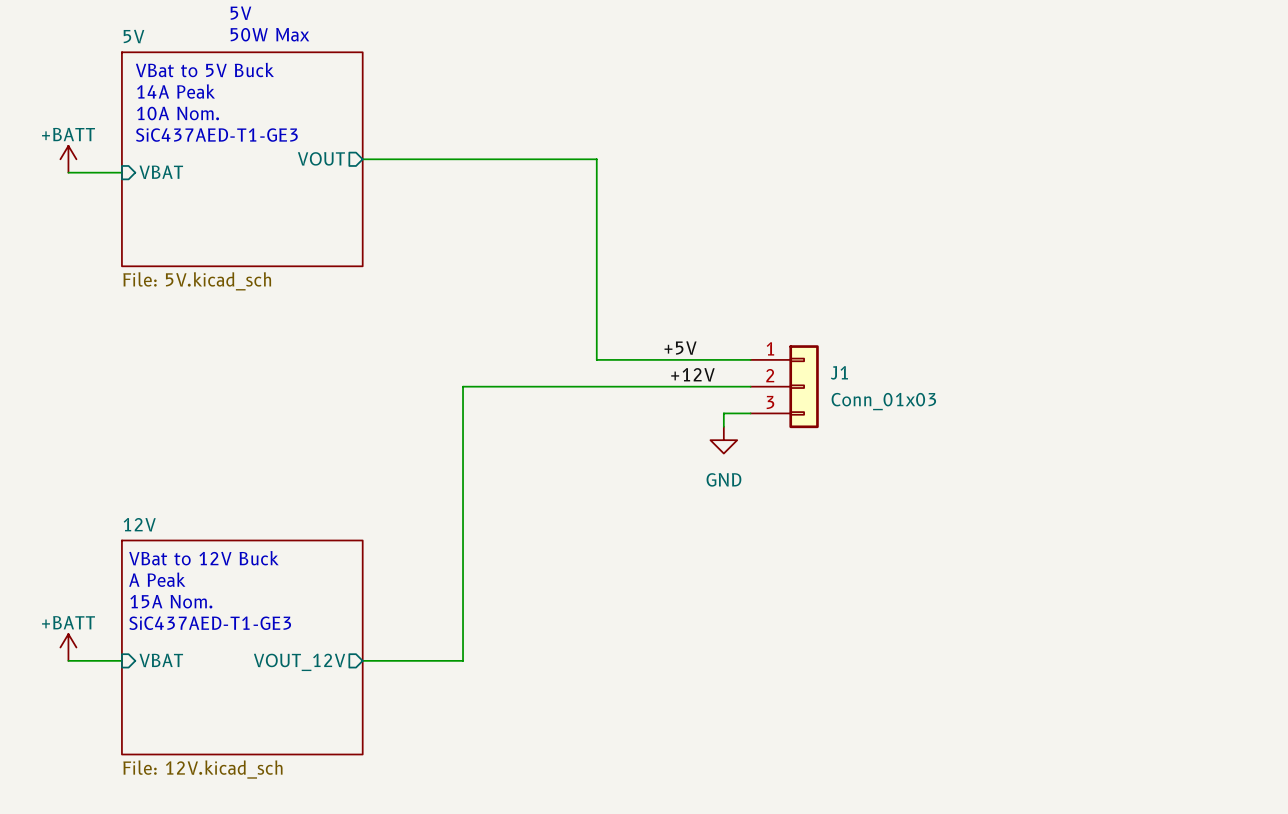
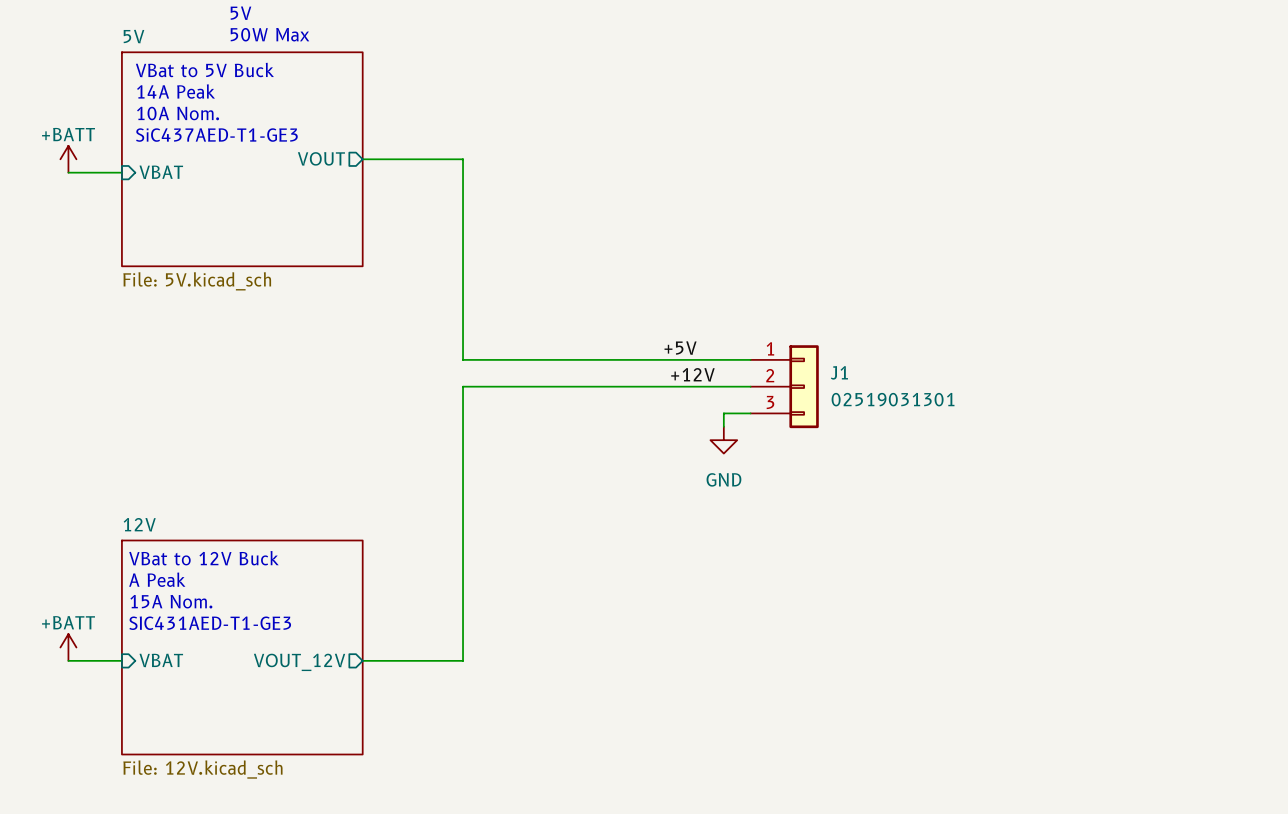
wire: (463, 159) (596, 159) (596, 359) -> (463, 159) (463, 359) (596, 359)
J1 value: Conn_01x03 (883, 401) -> 02519031301 (893, 399)
text: SiC437AED-T1-GE3 (210, 623) -> SIC431AED-T1-GE3 (210, 623)

